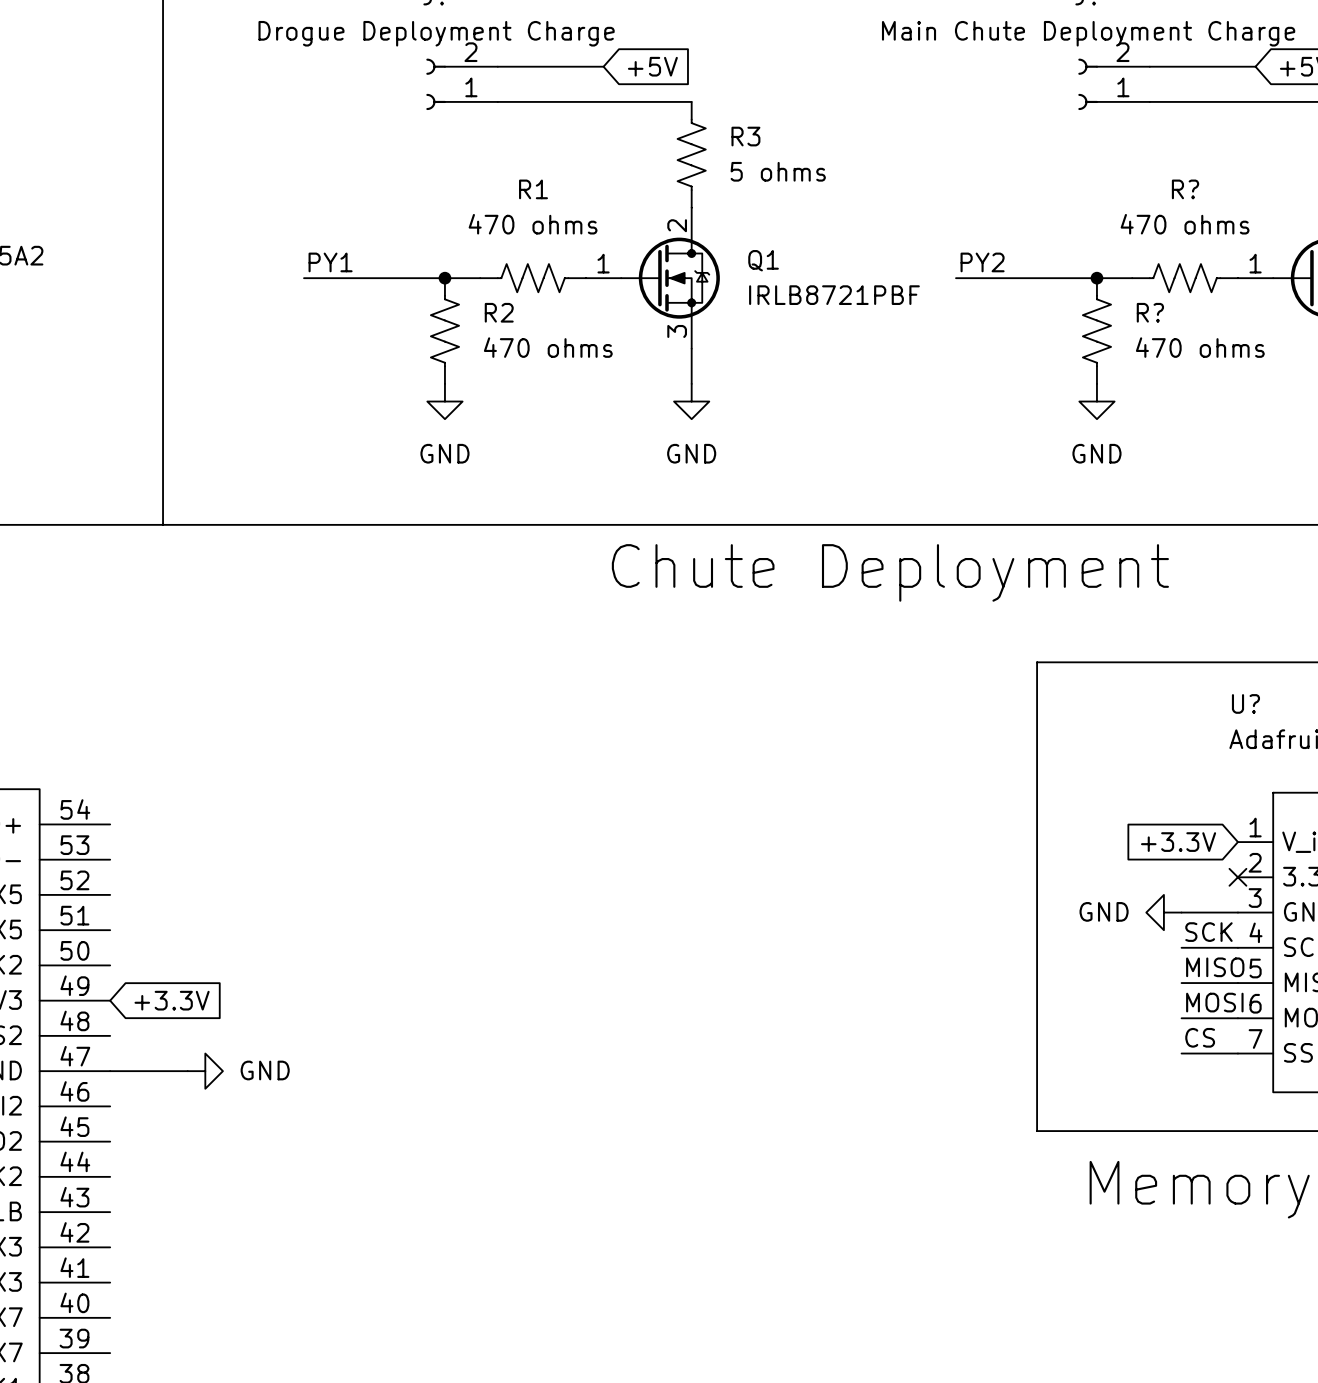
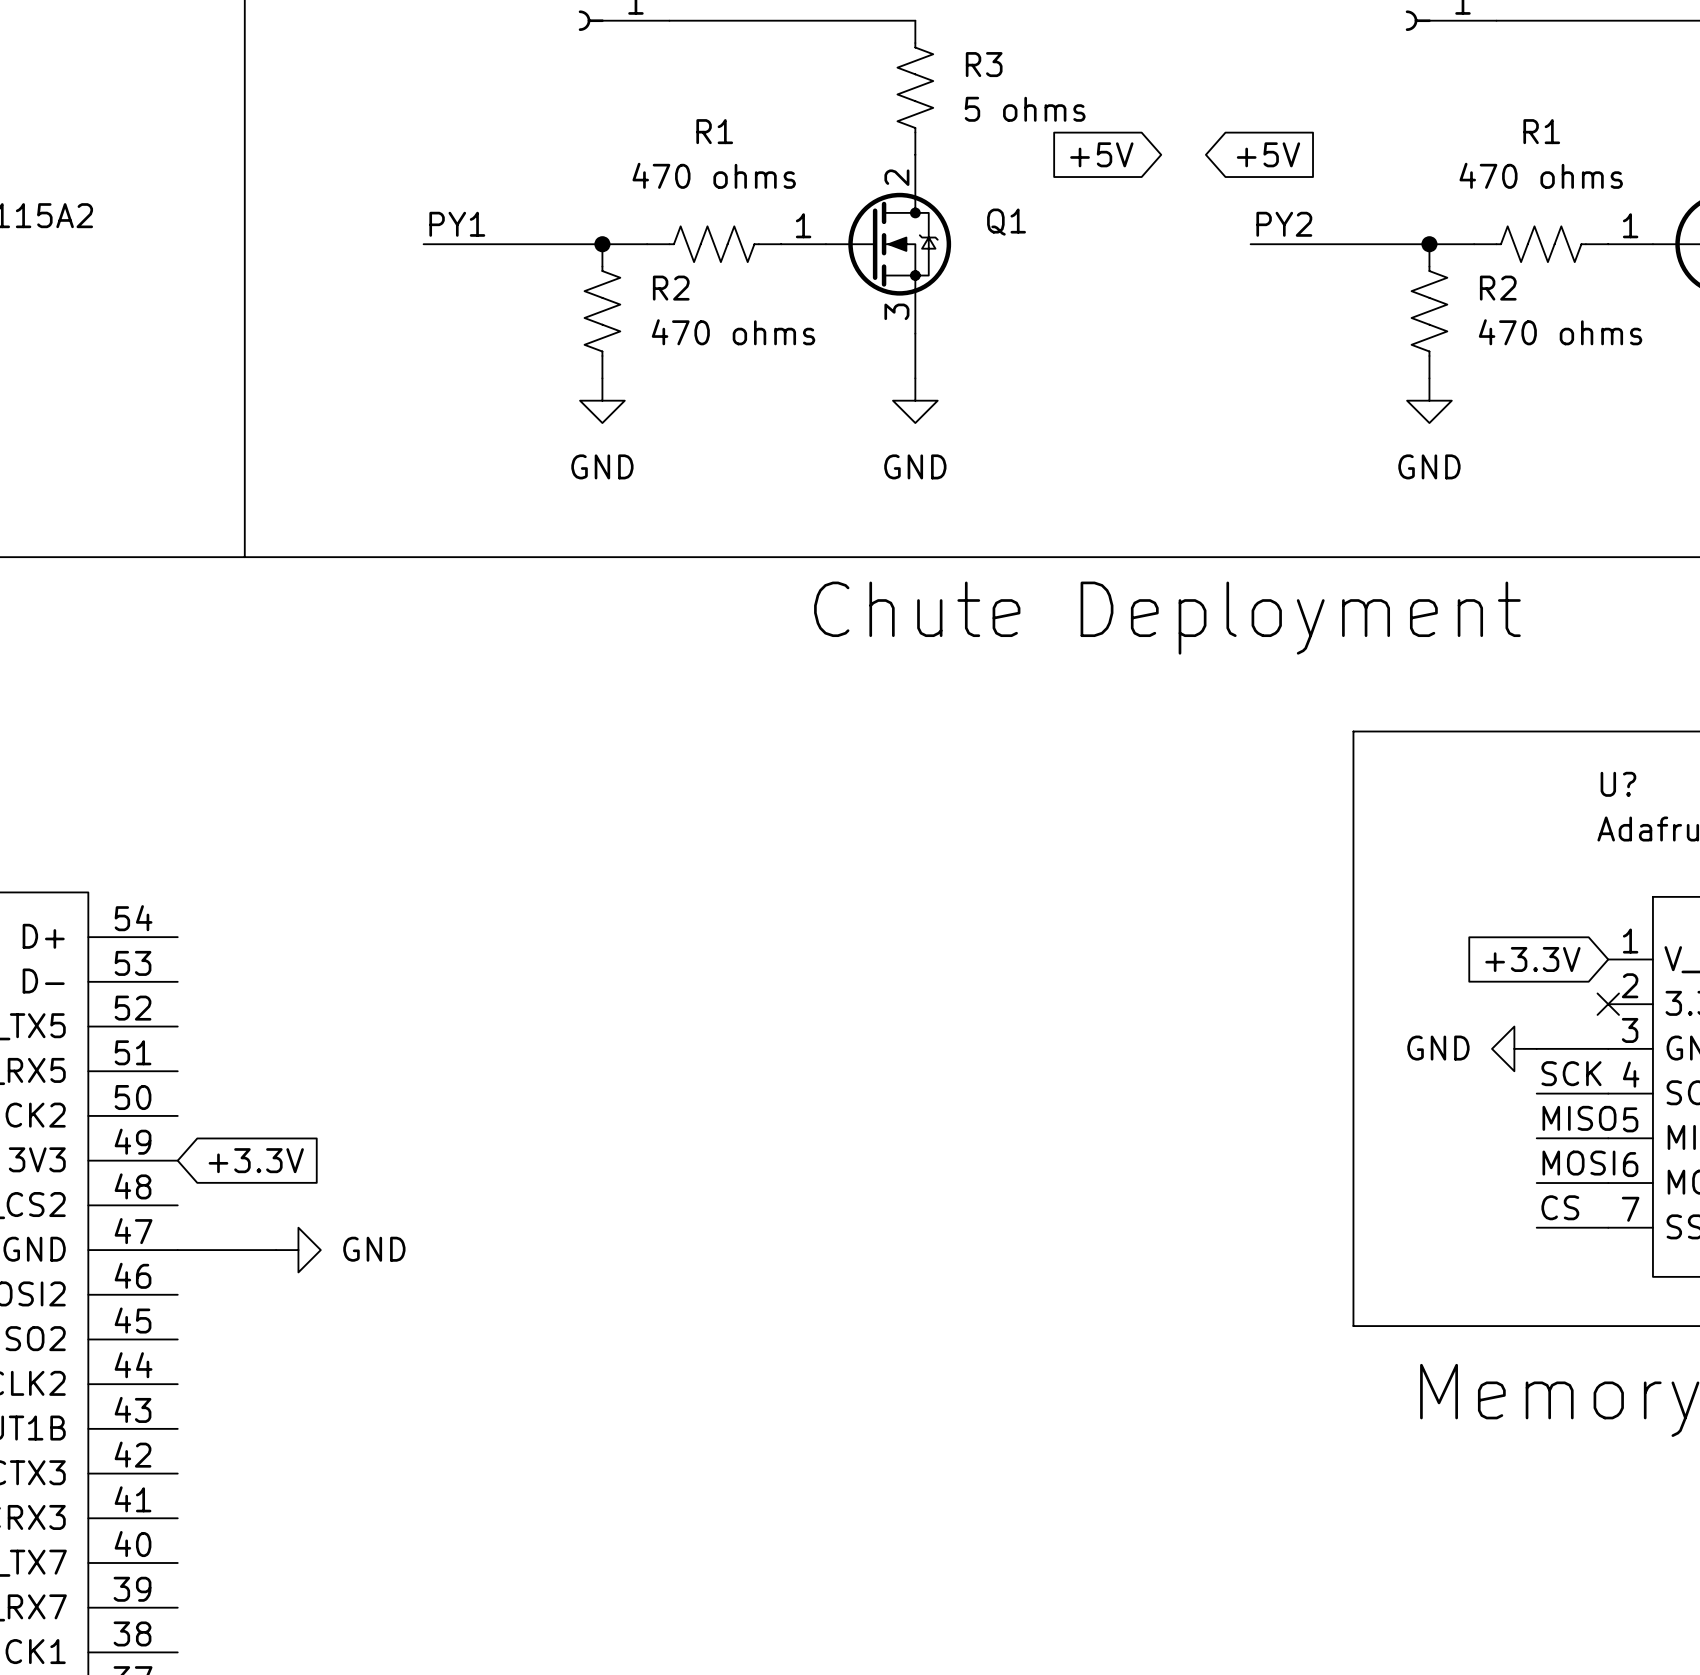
R? name: R? (1185, 189) -> R1 (1541, 131)
global label: none -> +5V (1101, 154)
global label: none -> +5V (1268, 154)
Q1 value: IRLB8721PBF (834, 295) -> none
R? name: R? (1150, 312) -> R2 (1498, 288)

